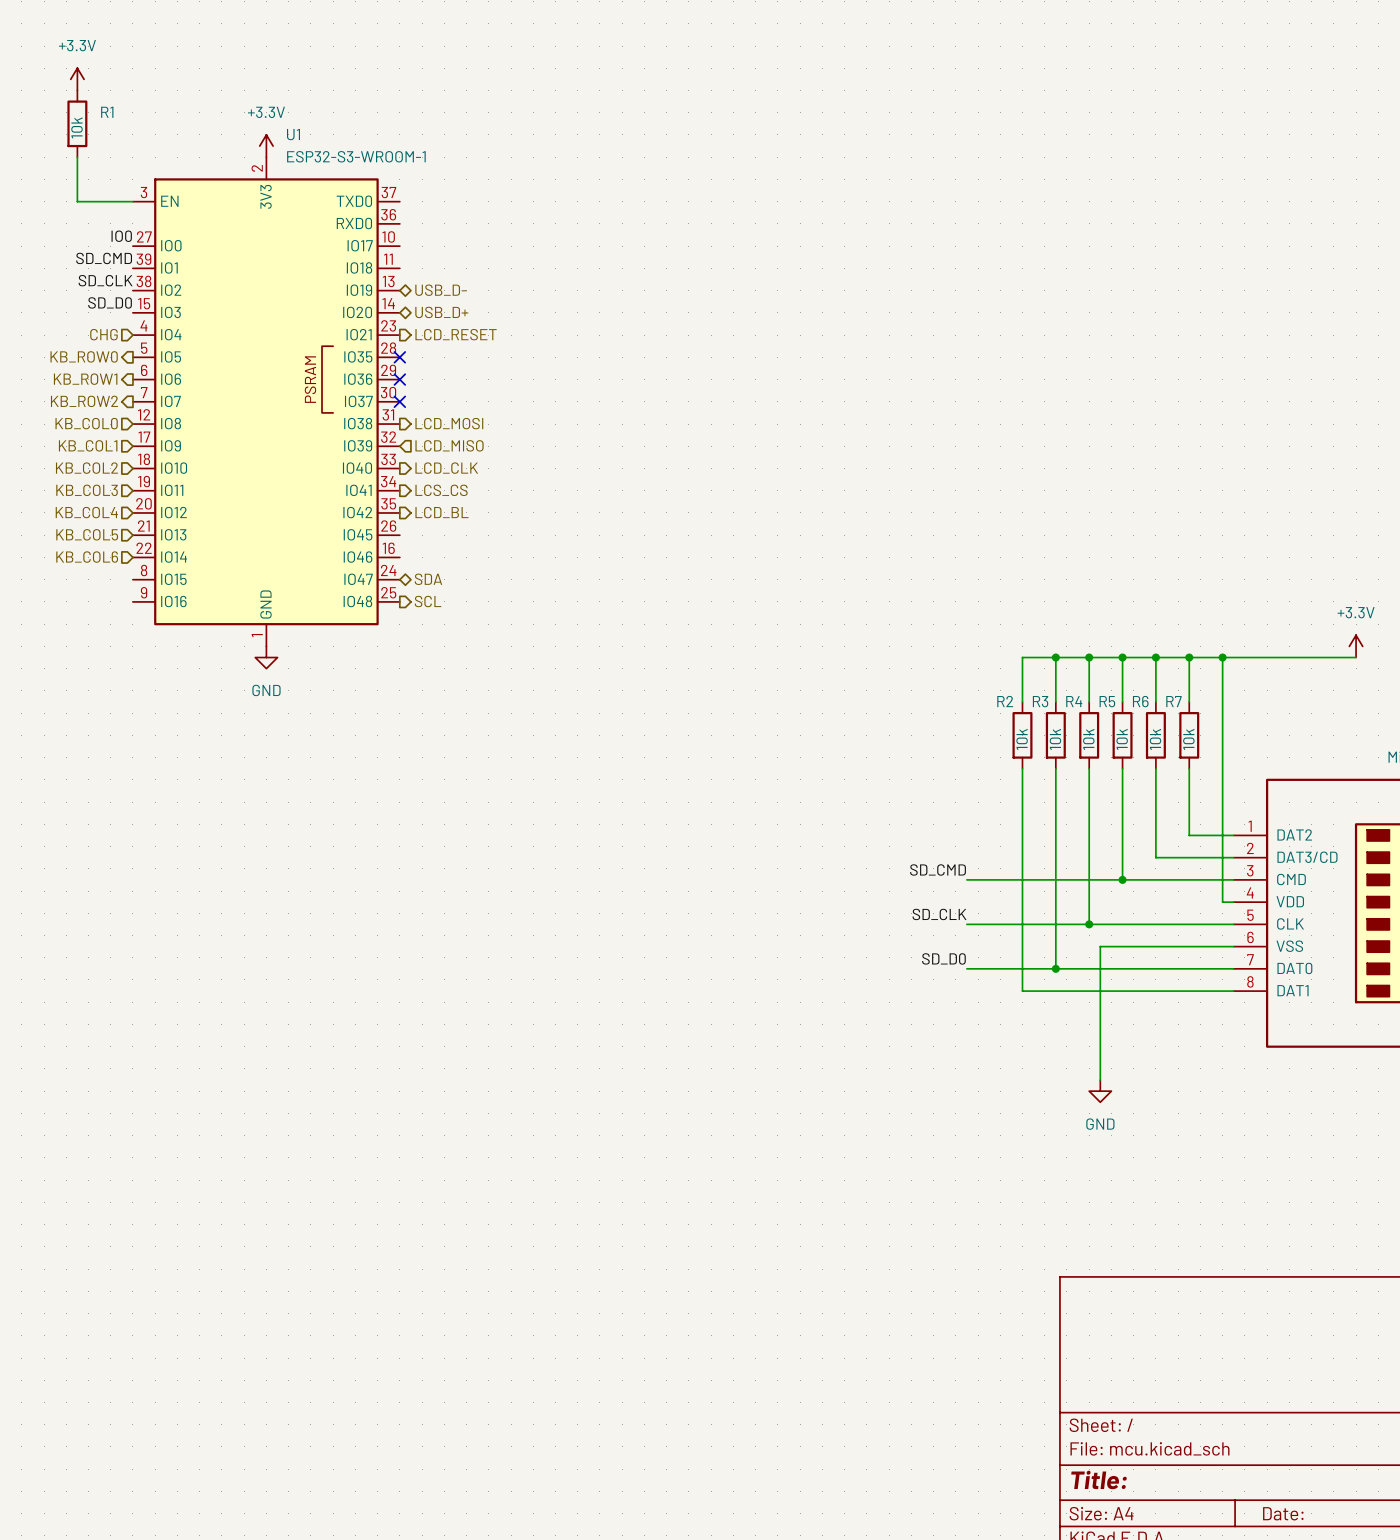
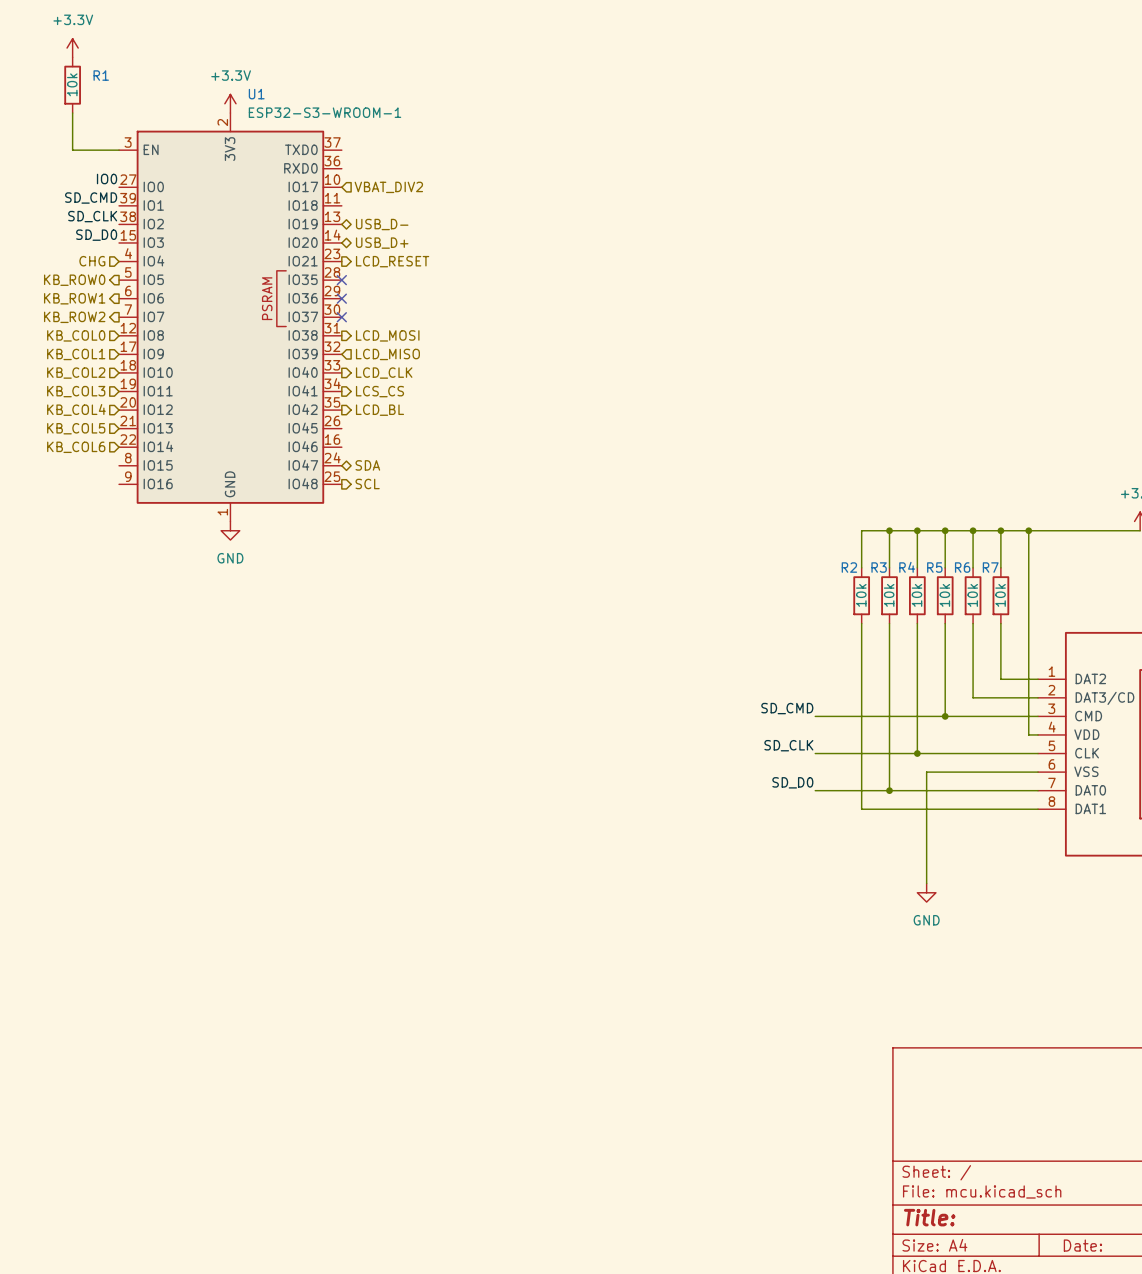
hierarchical label: none -> VBAT_DIV2 (388, 187)

